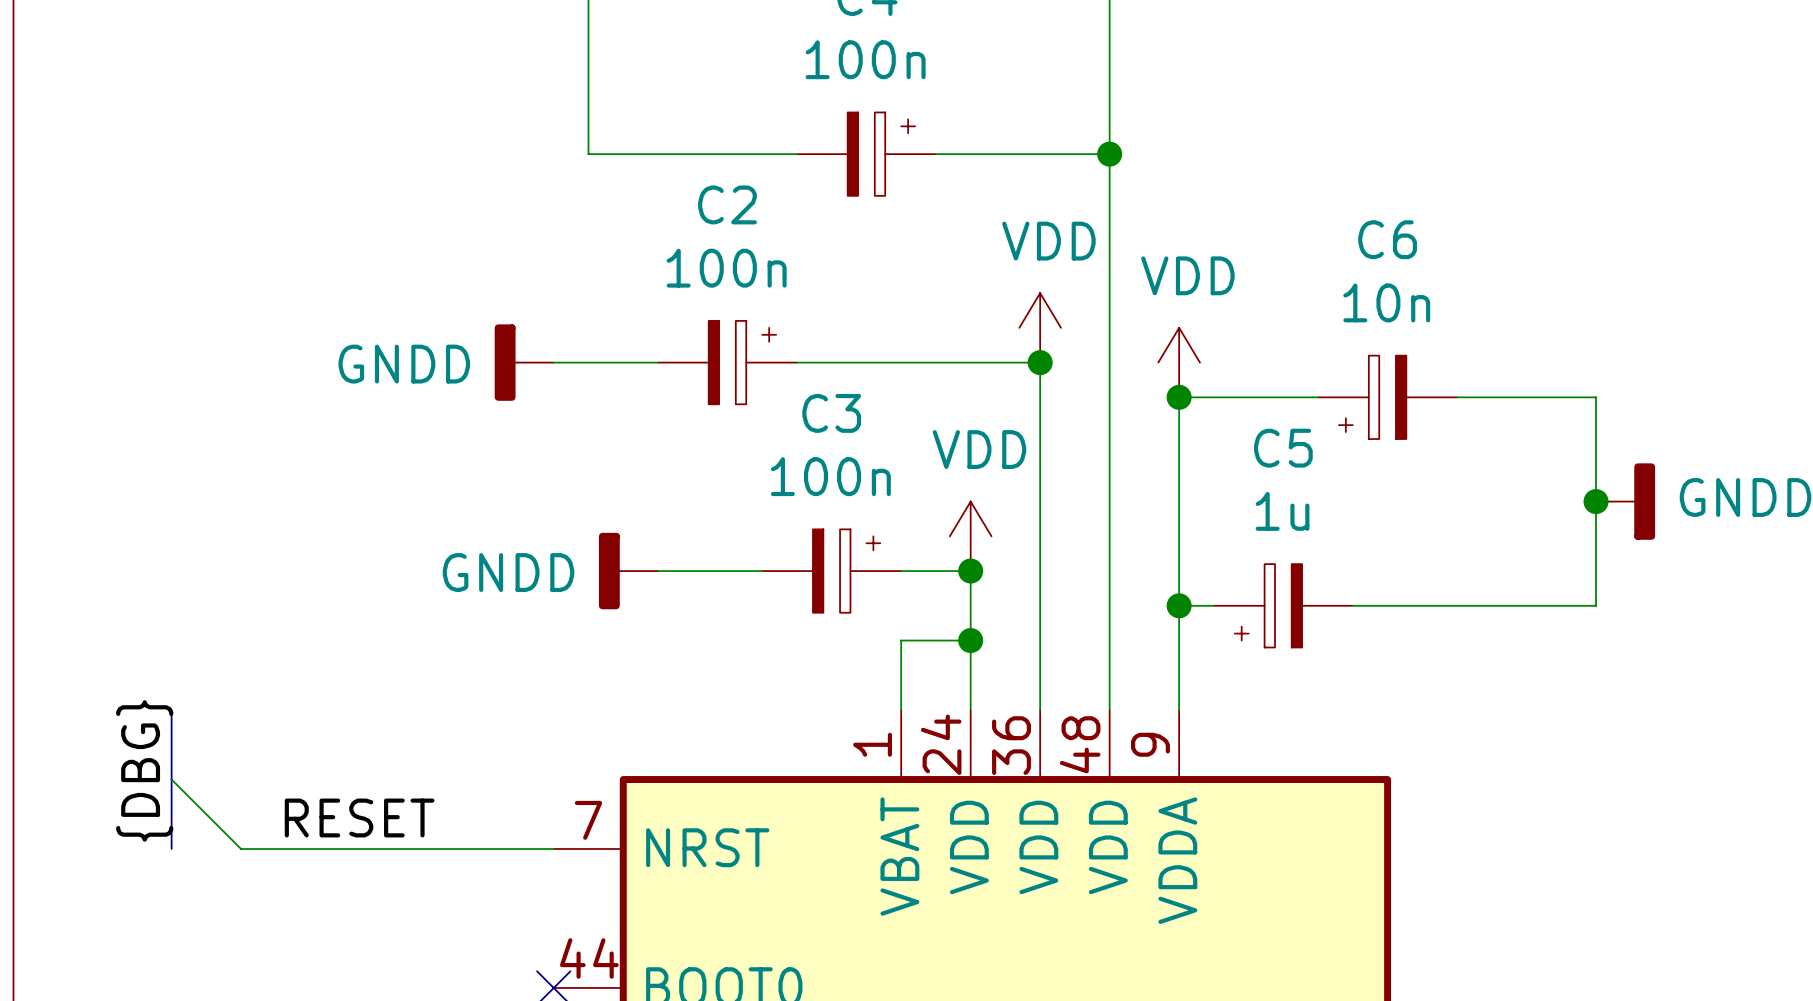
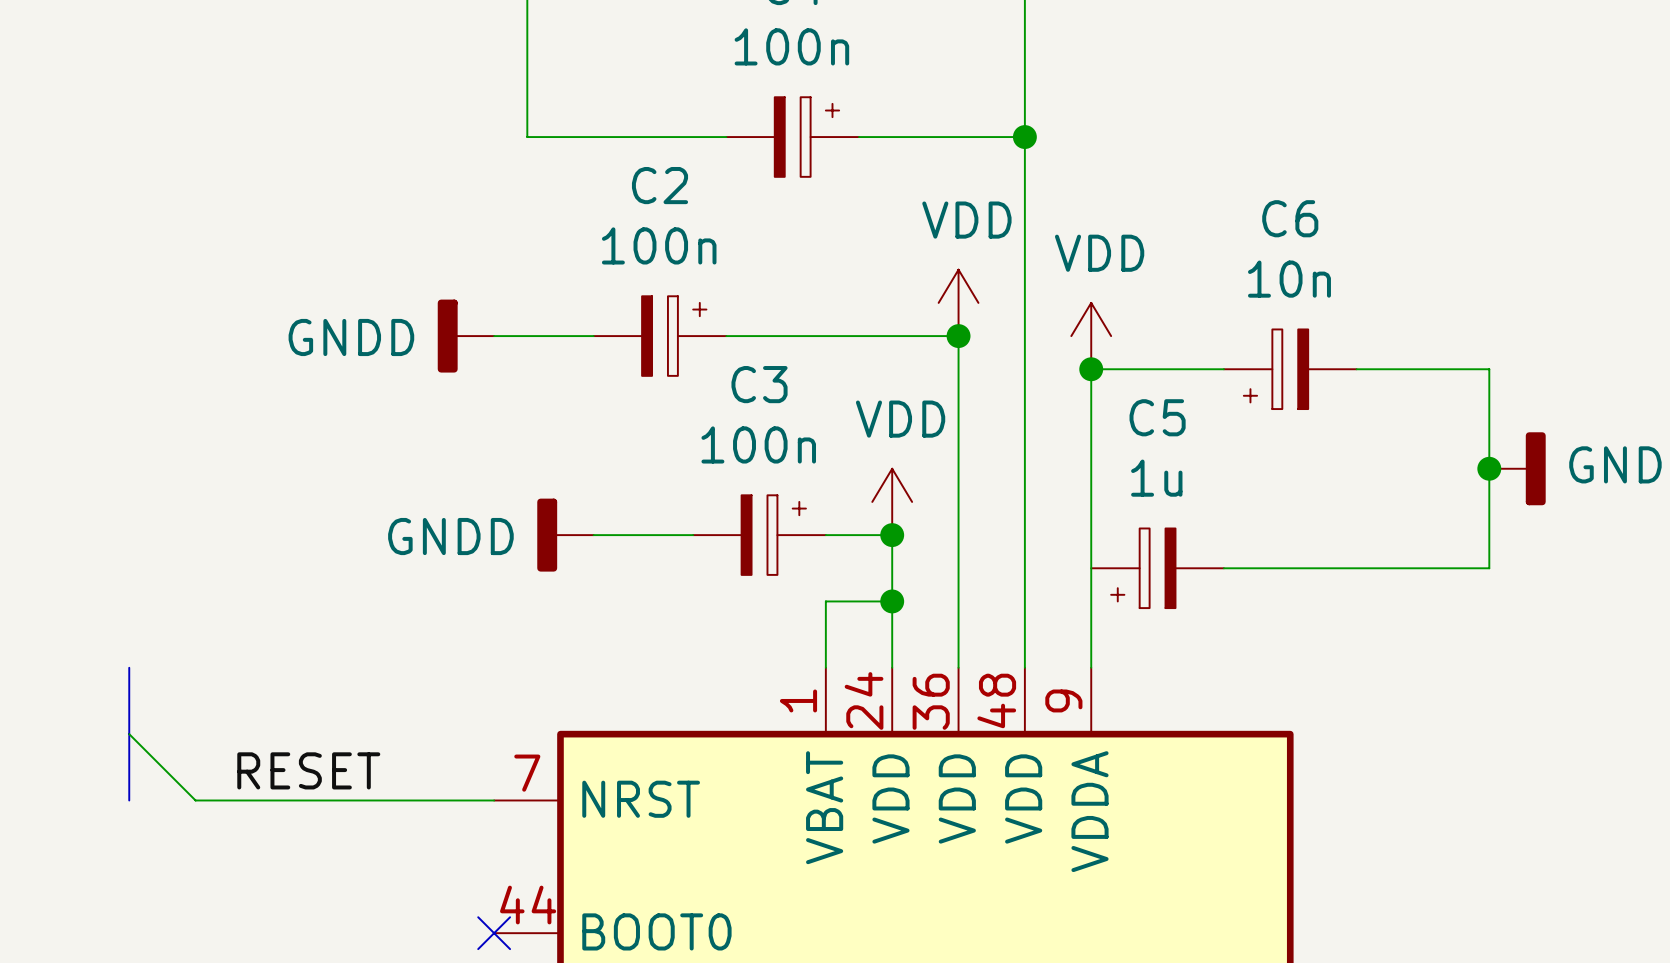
junction: (1179, 605) -> none
C5 position: (1283, 605) -> (1157, 568)
label: {DBG} (144, 770) -> none

